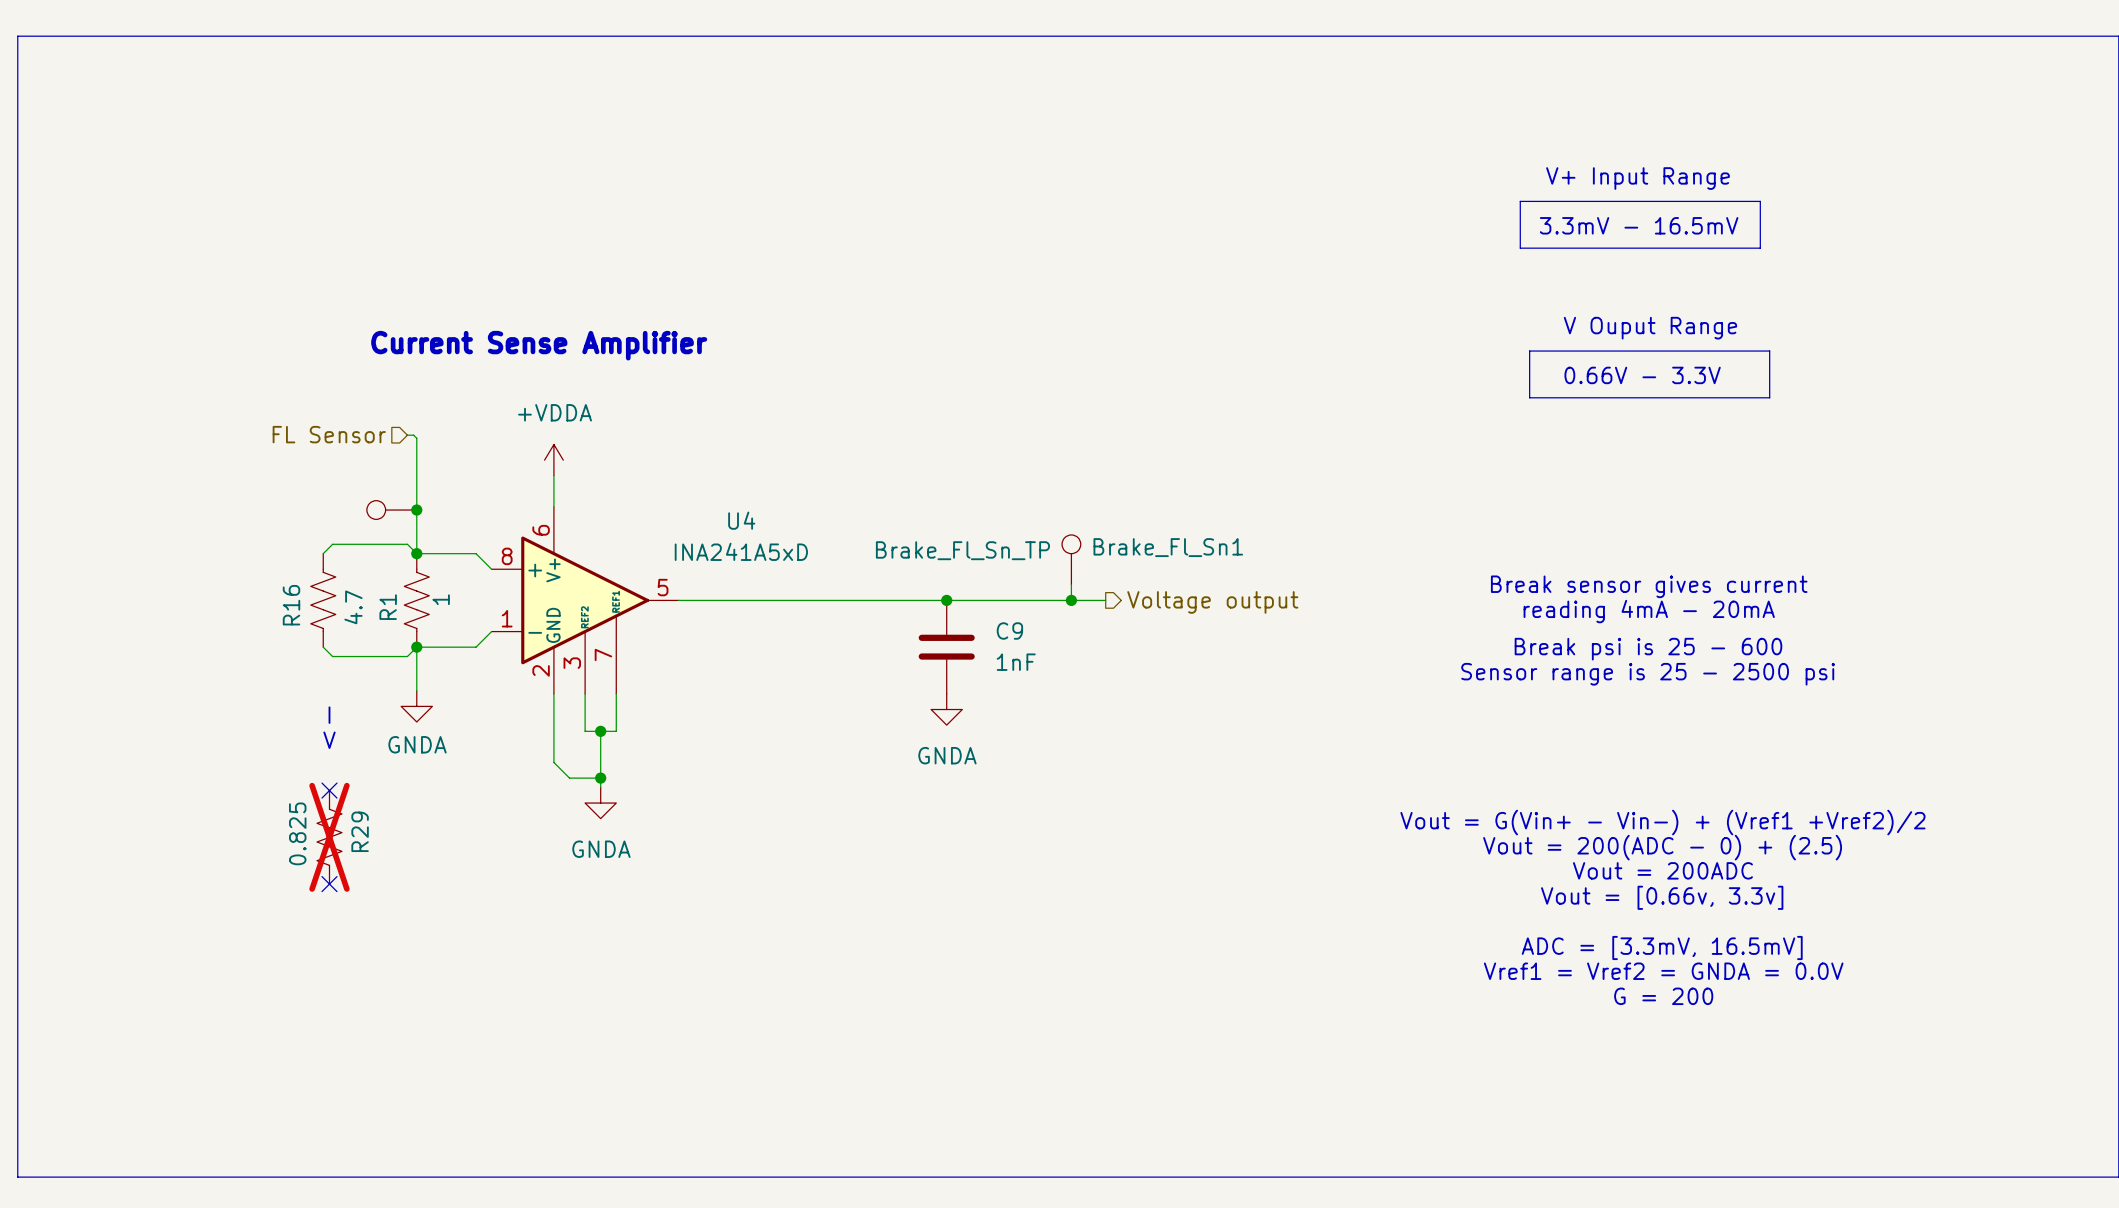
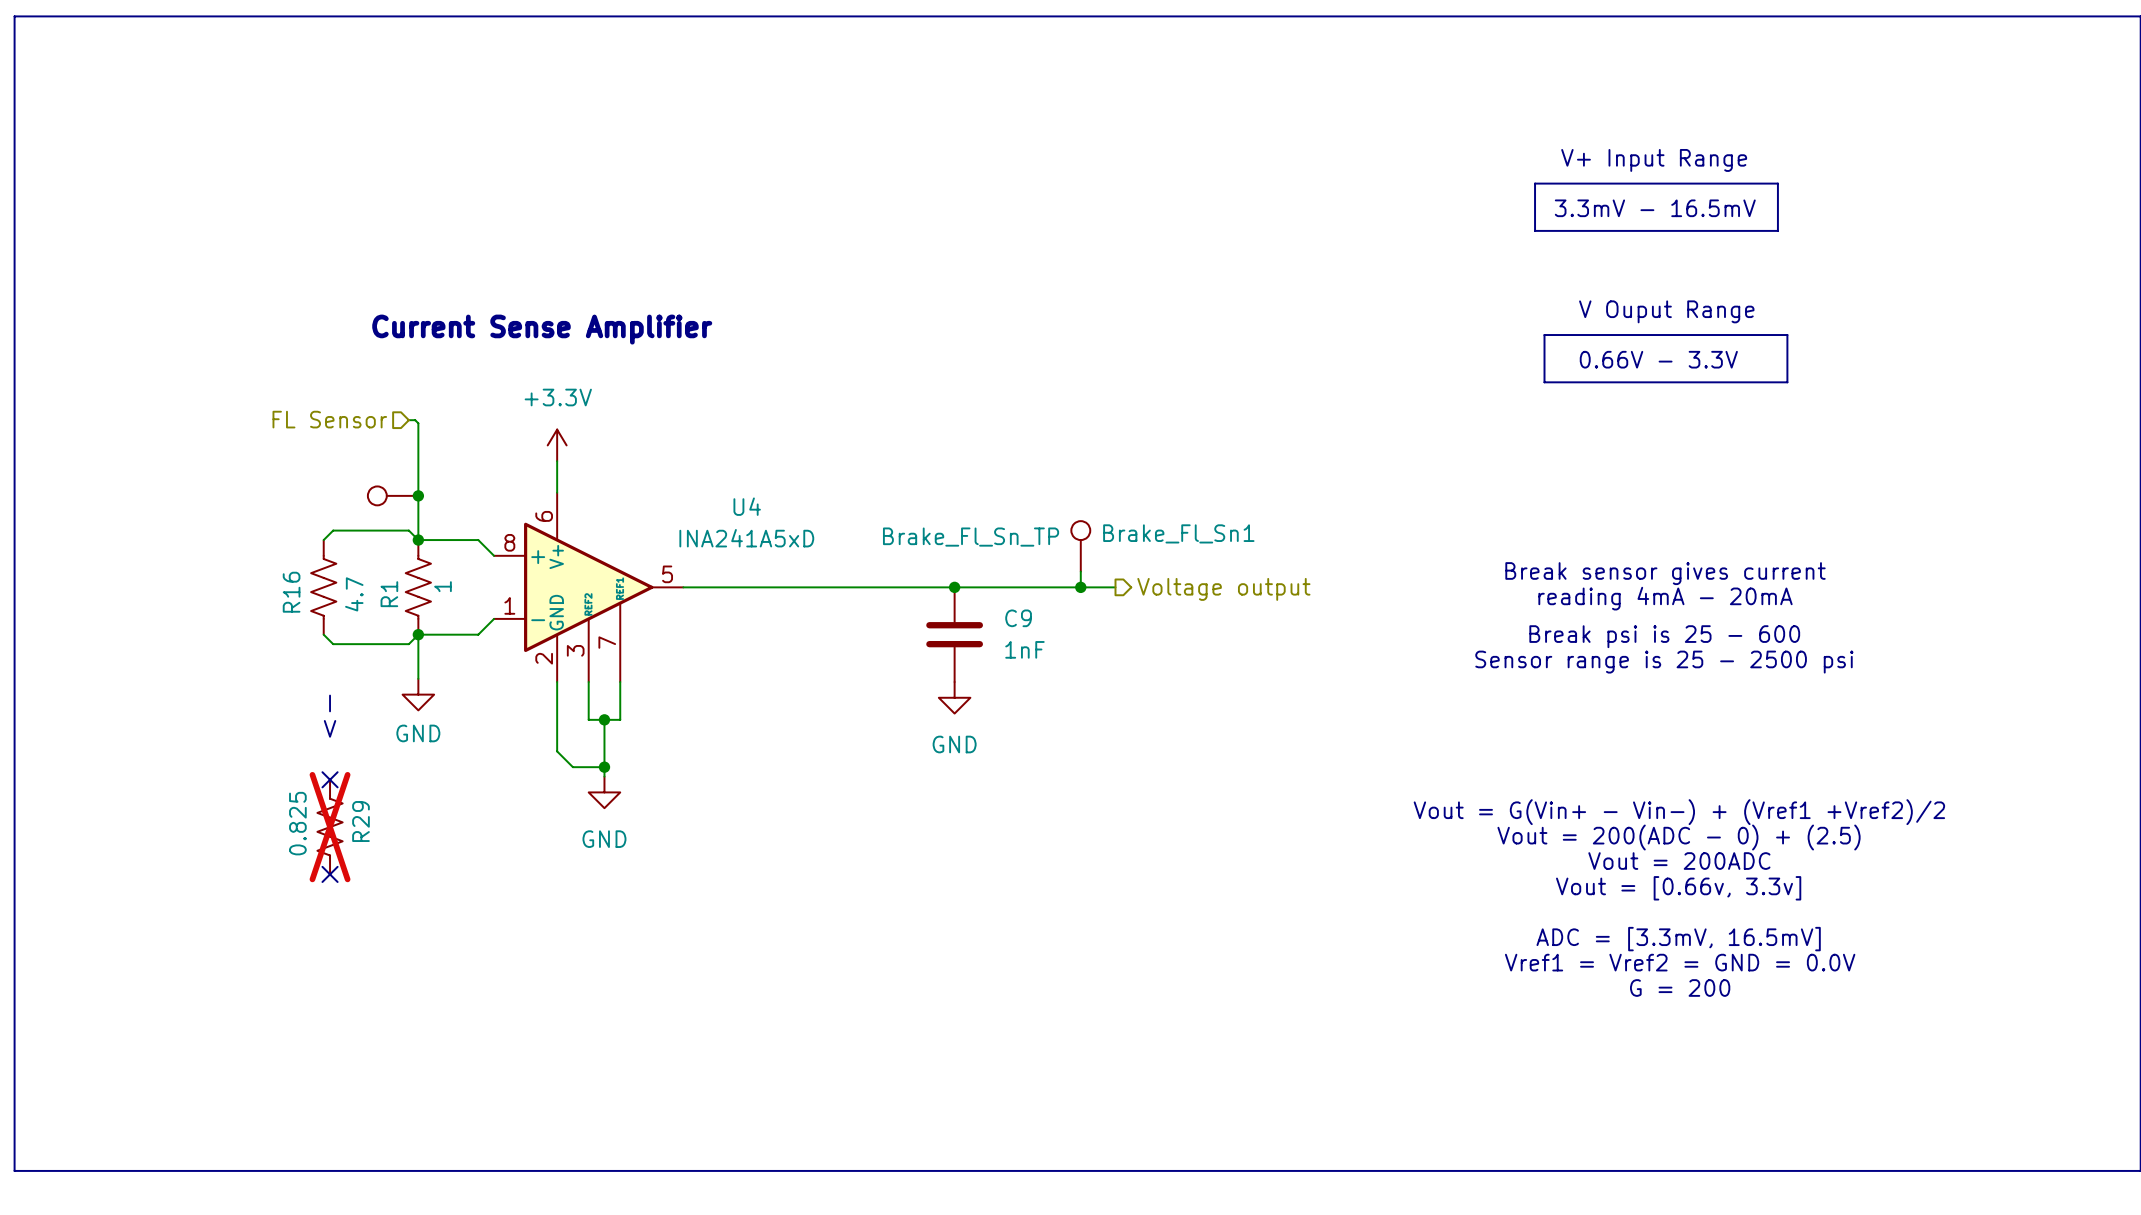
power symbol: +VDDA (553, 460) -> +3.3V (557, 445)
power symbol: GNDA (416, 706) -> GND (418, 694)
power symbol: GNDA (946, 709) -> GND (954, 697)
power symbol: GNDA (600, 803) -> GND (604, 792)
text: Vref1 = Vref2 = GNDA = 0.0V (1663, 971) -> Vref1 = Vref2 = GND = 0.0V (1680, 962)

